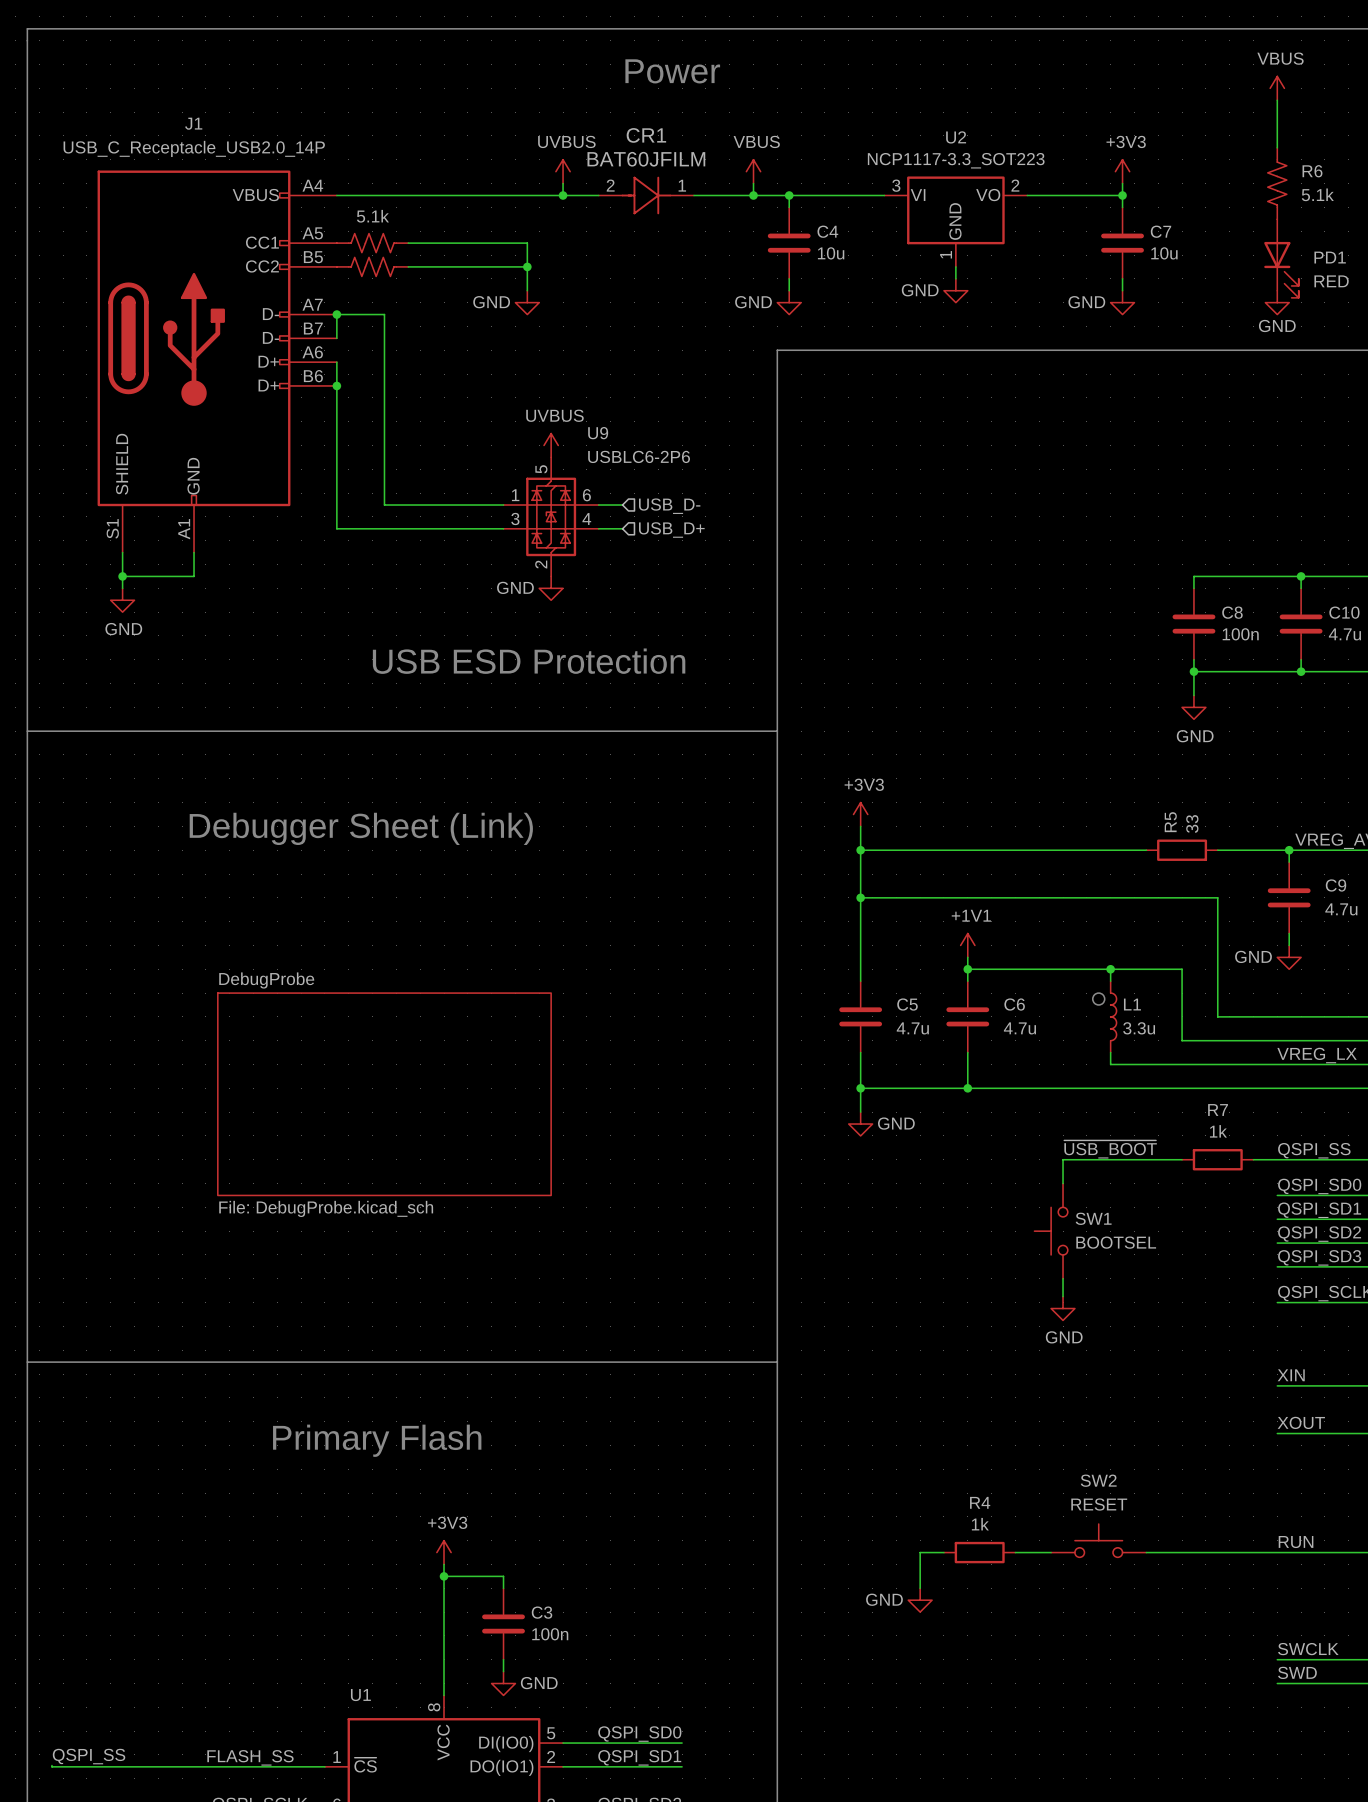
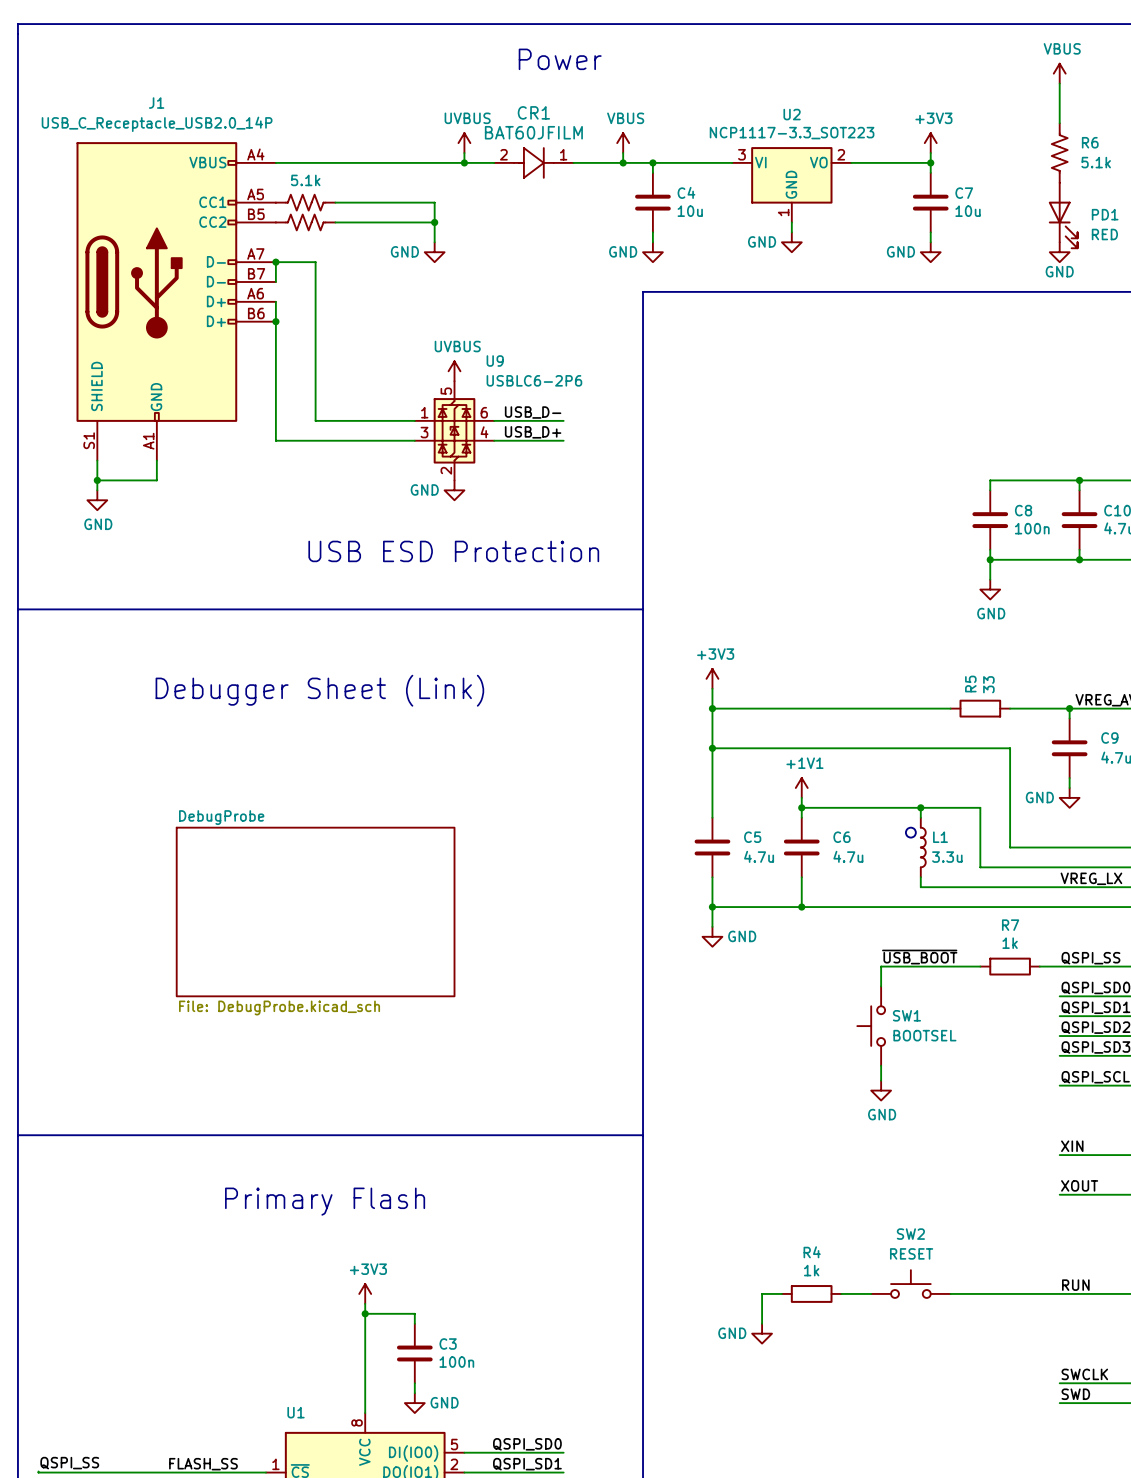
label: none -> USB_D- (533, 412)
wire: none -> (514, 420) (563, 420)
hierarchical label: USB_D- (669, 506) -> none
label: none -> USB_D+ (533, 432)
wire: none -> (514, 440) (563, 440)
hierarchical label: USB_D+ (671, 530) -> none

